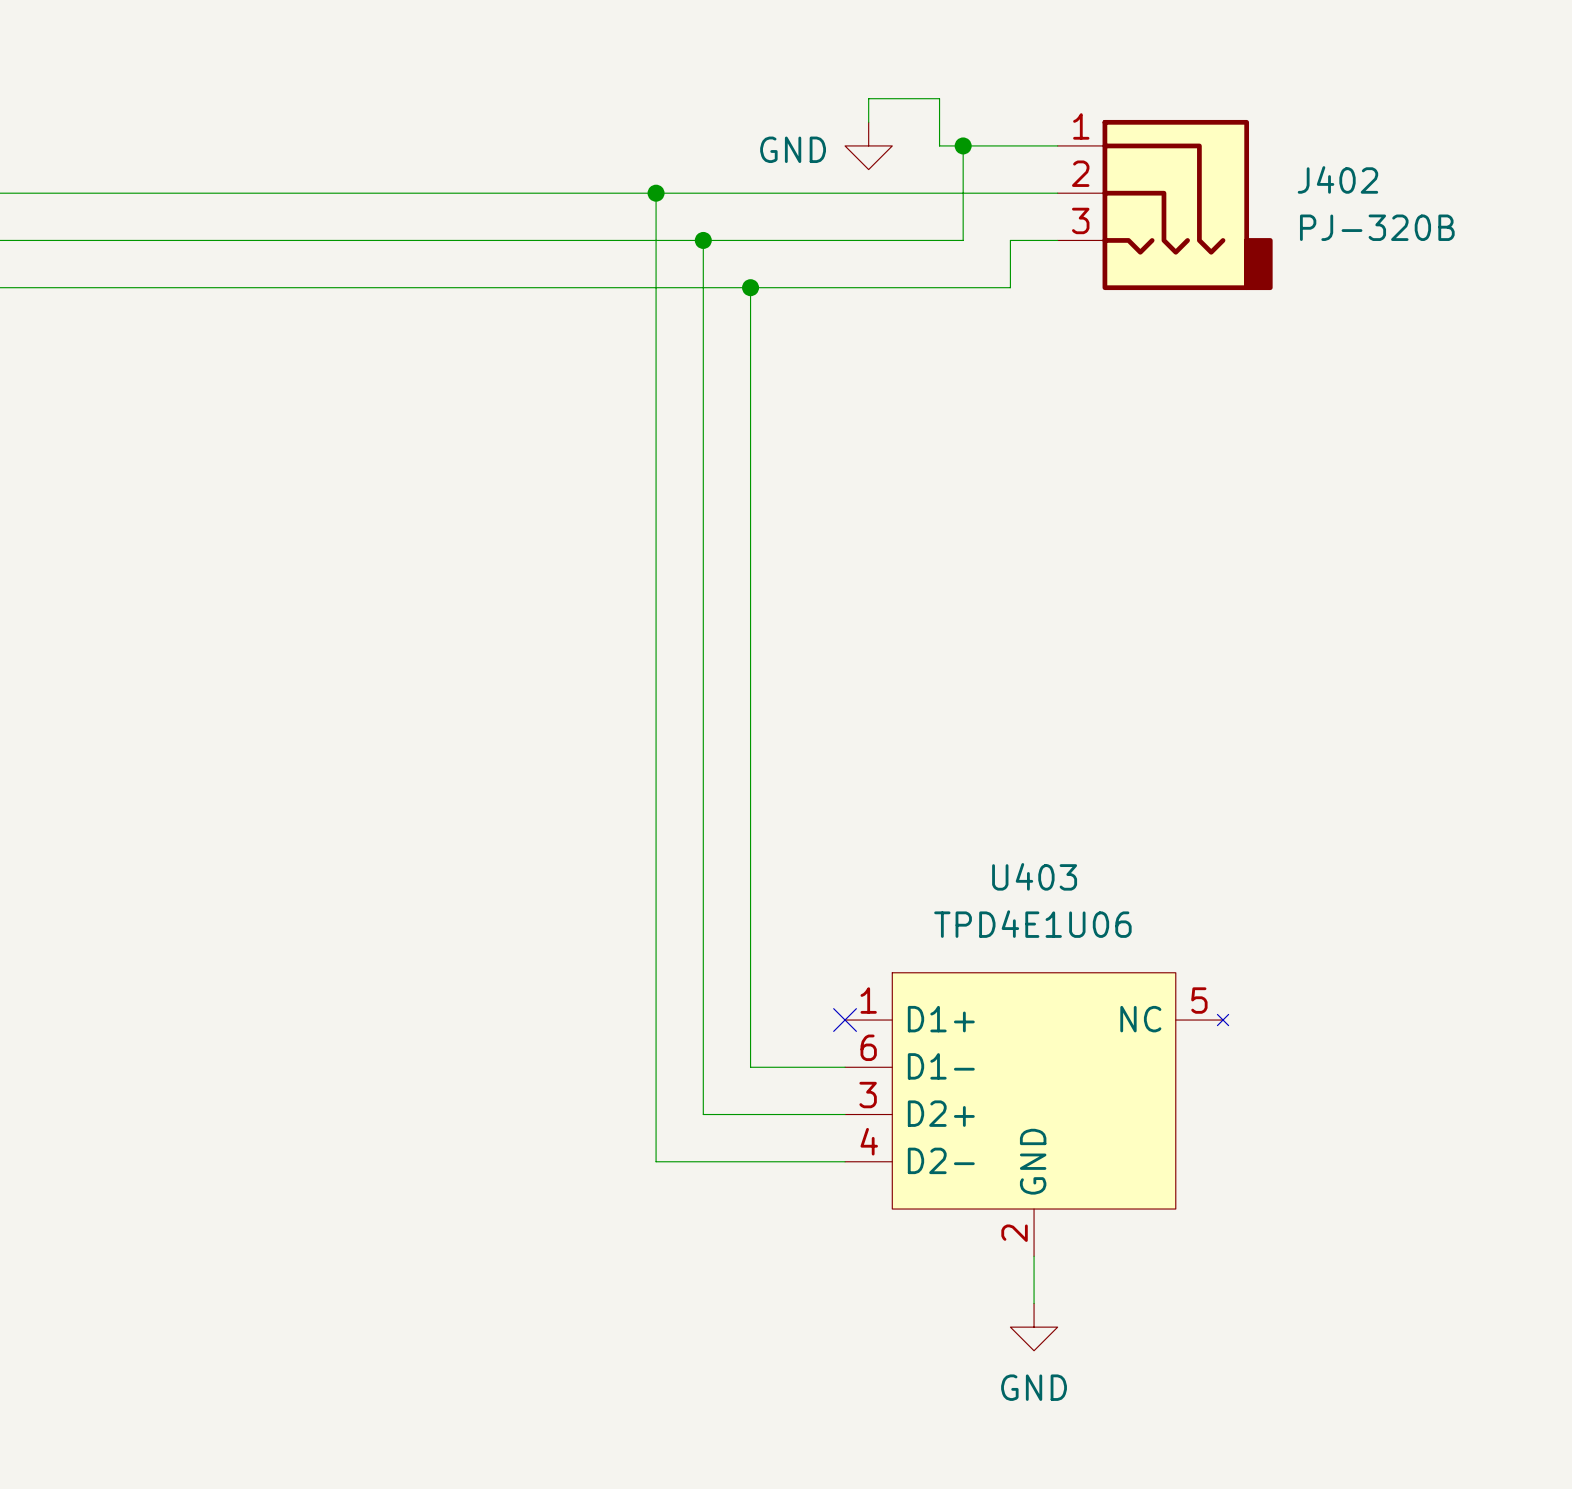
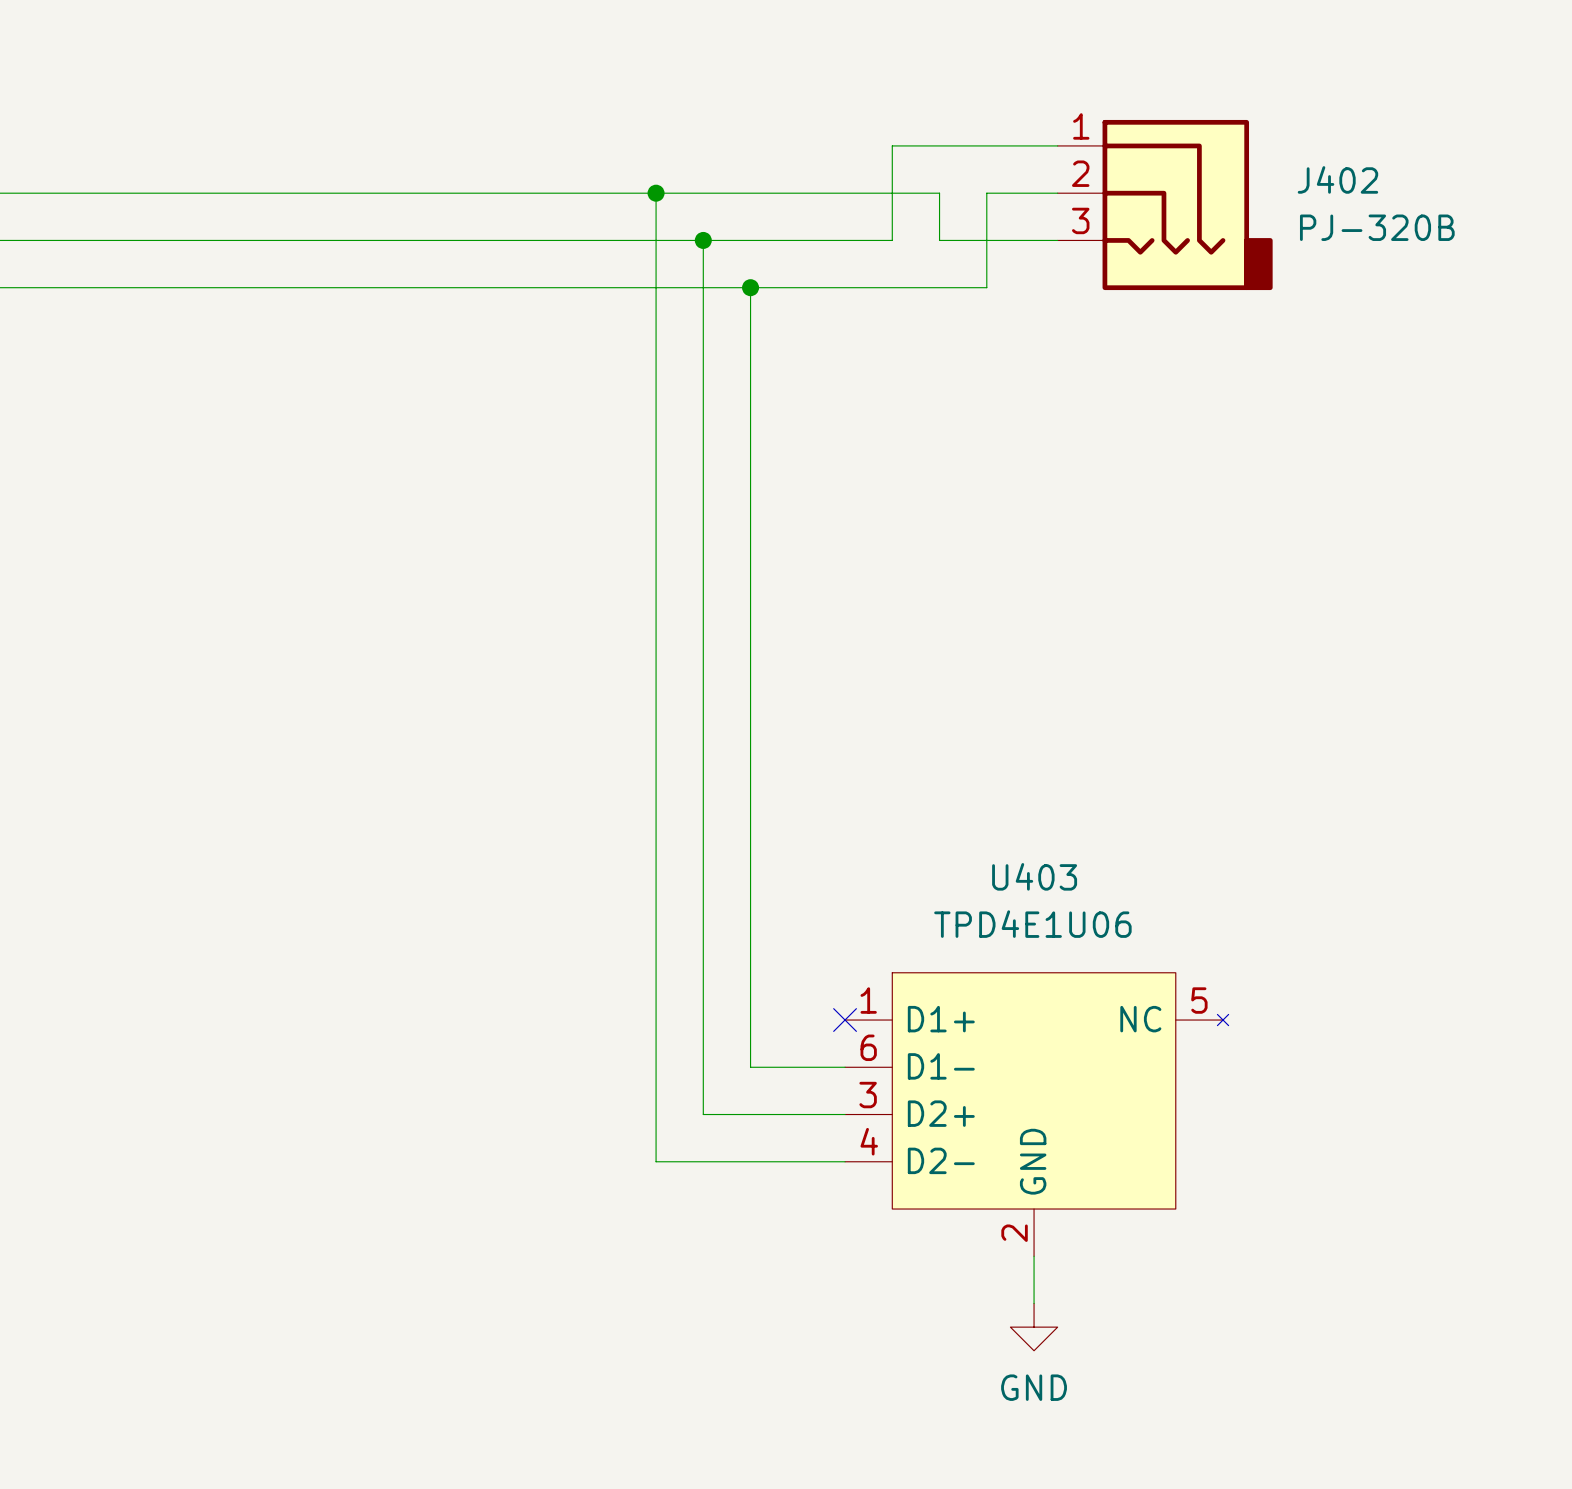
wire: (868, 122) (868, 98) (939, 98) (939, 145) -> none
power symbol: GND (868, 145) -> none
wire: (963, 145) (963, 240) -> (1010, 240) (963, 240)
junction: (963, 145) -> none
wire: (939, 193) (986, 193) -> (939, 193) (939, 240)
wire: (892, 240) (939, 240) -> (892, 240) (892, 145) (939, 145)
wire: (1010, 240) (1010, 287) (986, 287) -> (986, 193) (986, 287)

